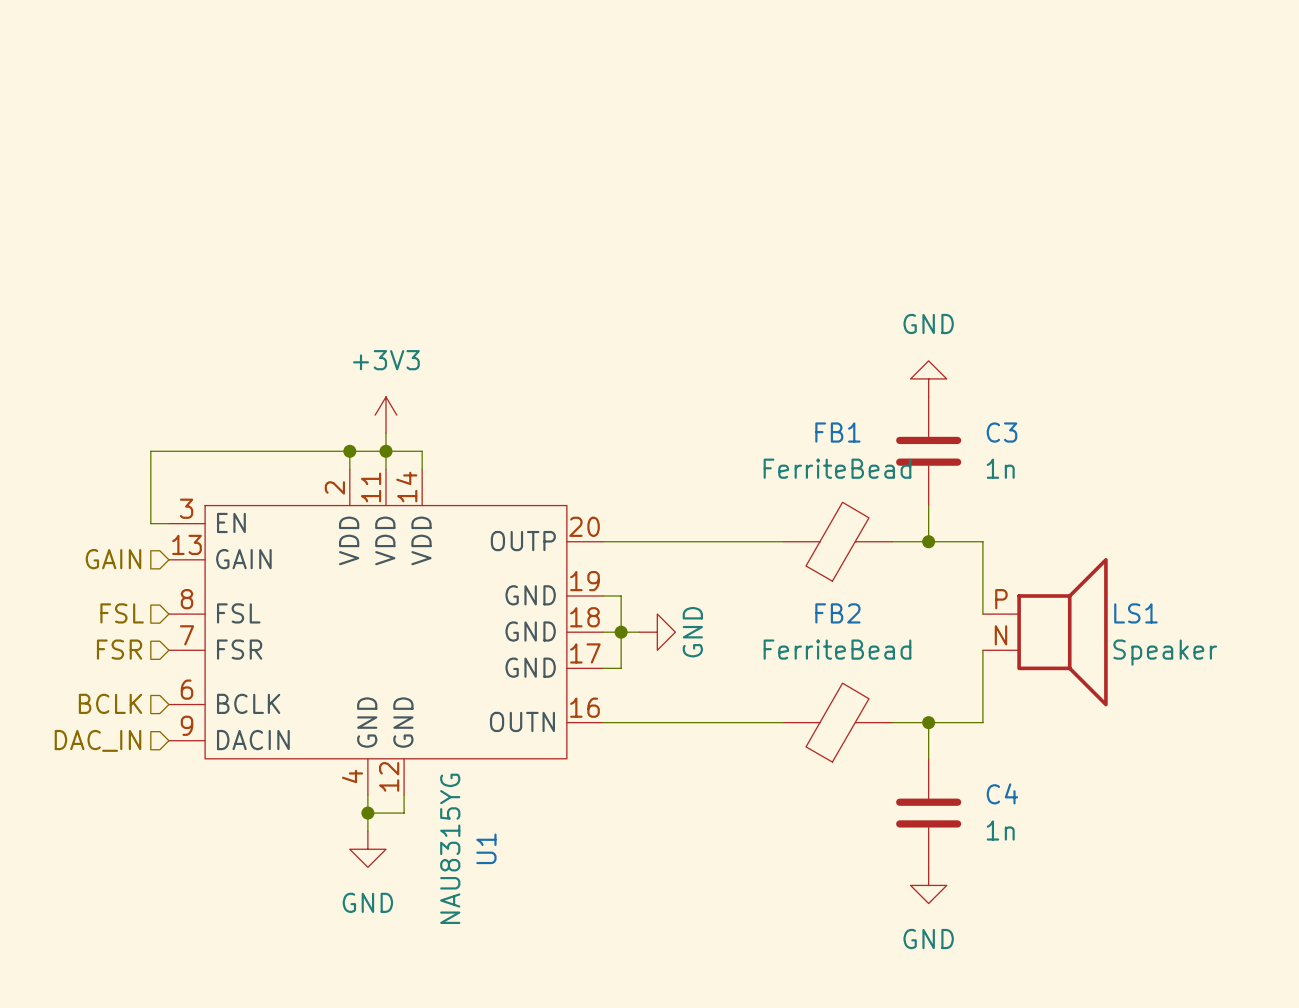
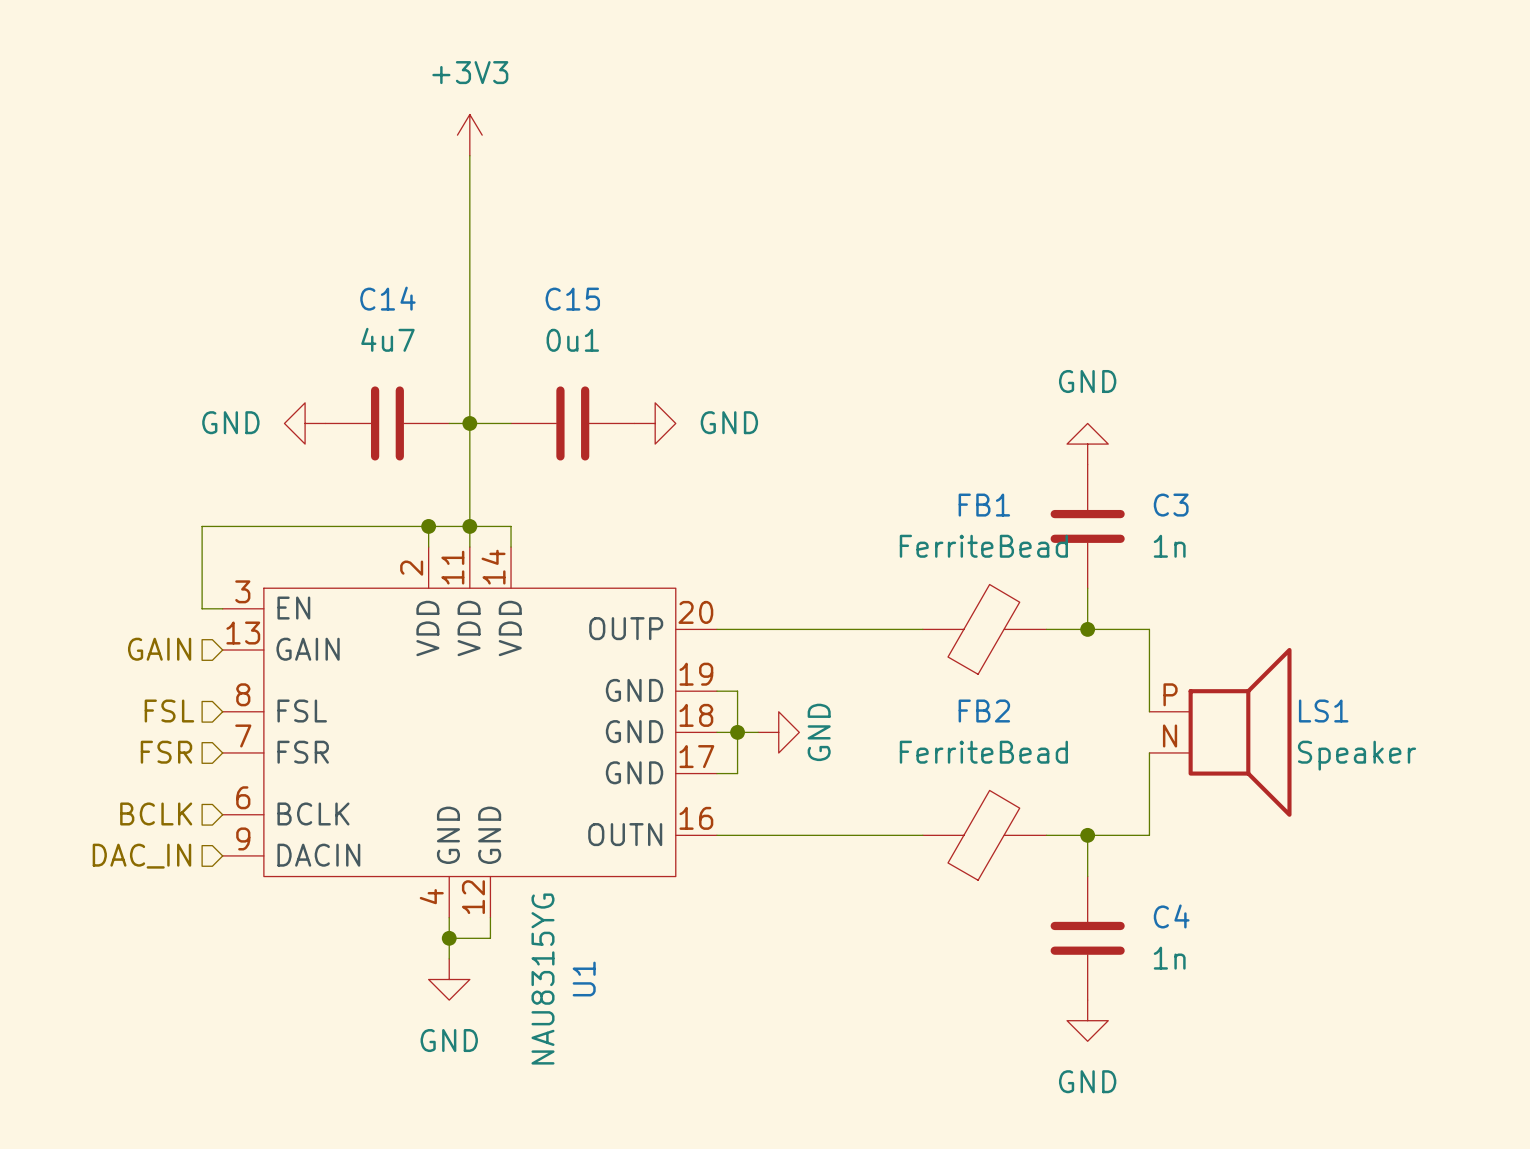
wire: none -> (469, 155) (469, 505)
power symbol: none -> GND (305, 423)
C14: none -> 4u7 (387, 423)
wire: none -> (449, 423) (511, 423)
junction: none -> (469, 423)
C15: none -> 0u1 (572, 423)
power symbol: none -> GND (655, 423)
power symbol position: +3V3 (385, 415) -> +3V3 (469, 135)

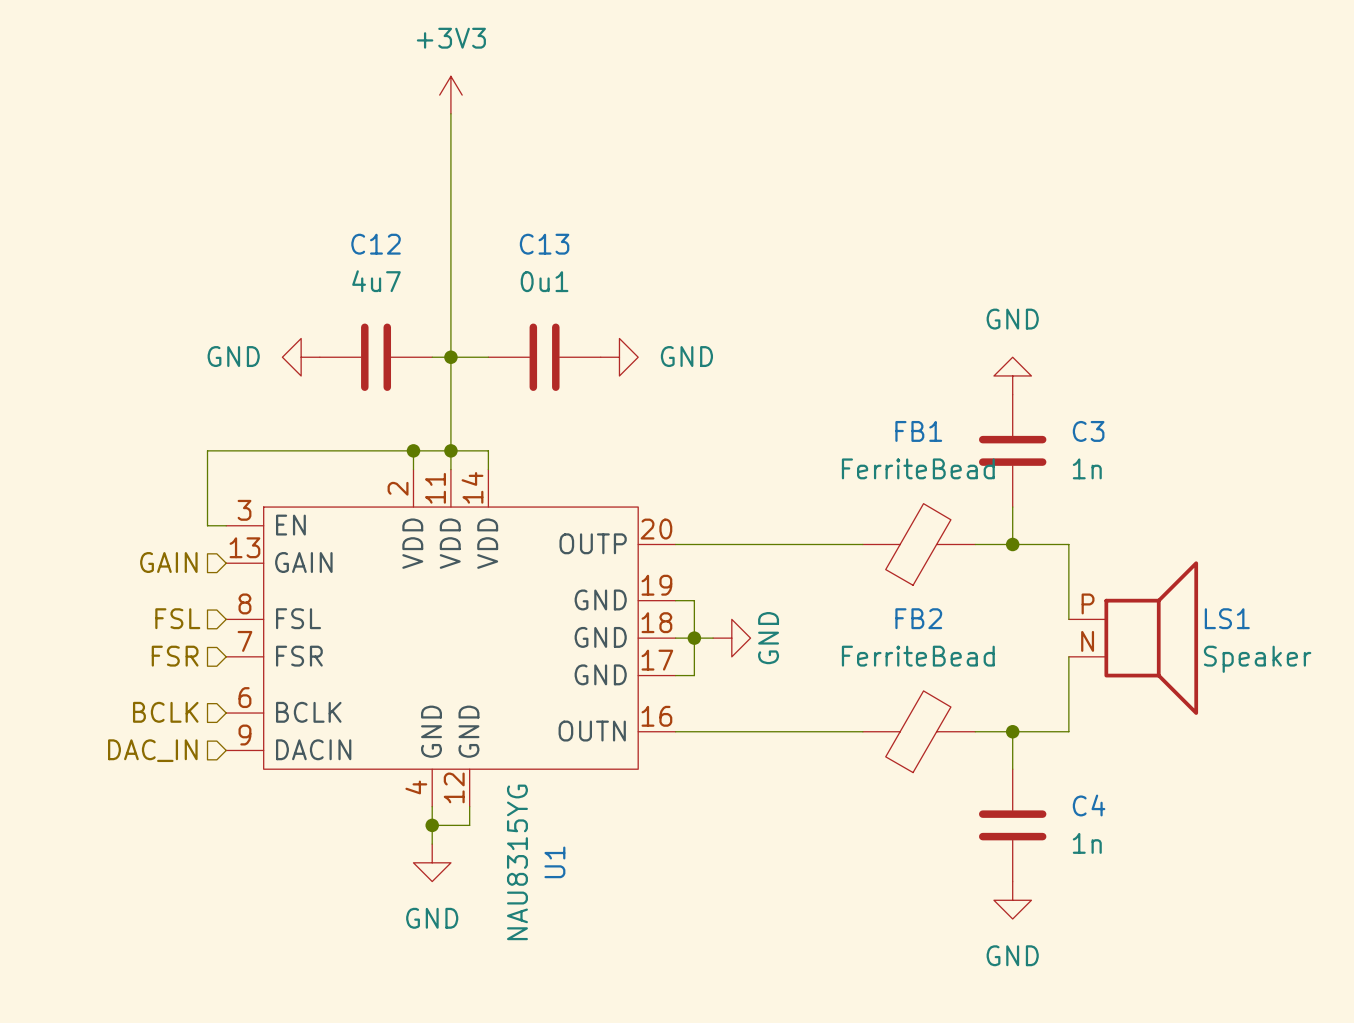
C14 name: C14 (387, 298) -> C12 (376, 244)
C15 name: C15 (572, 299) -> C13 (544, 244)

